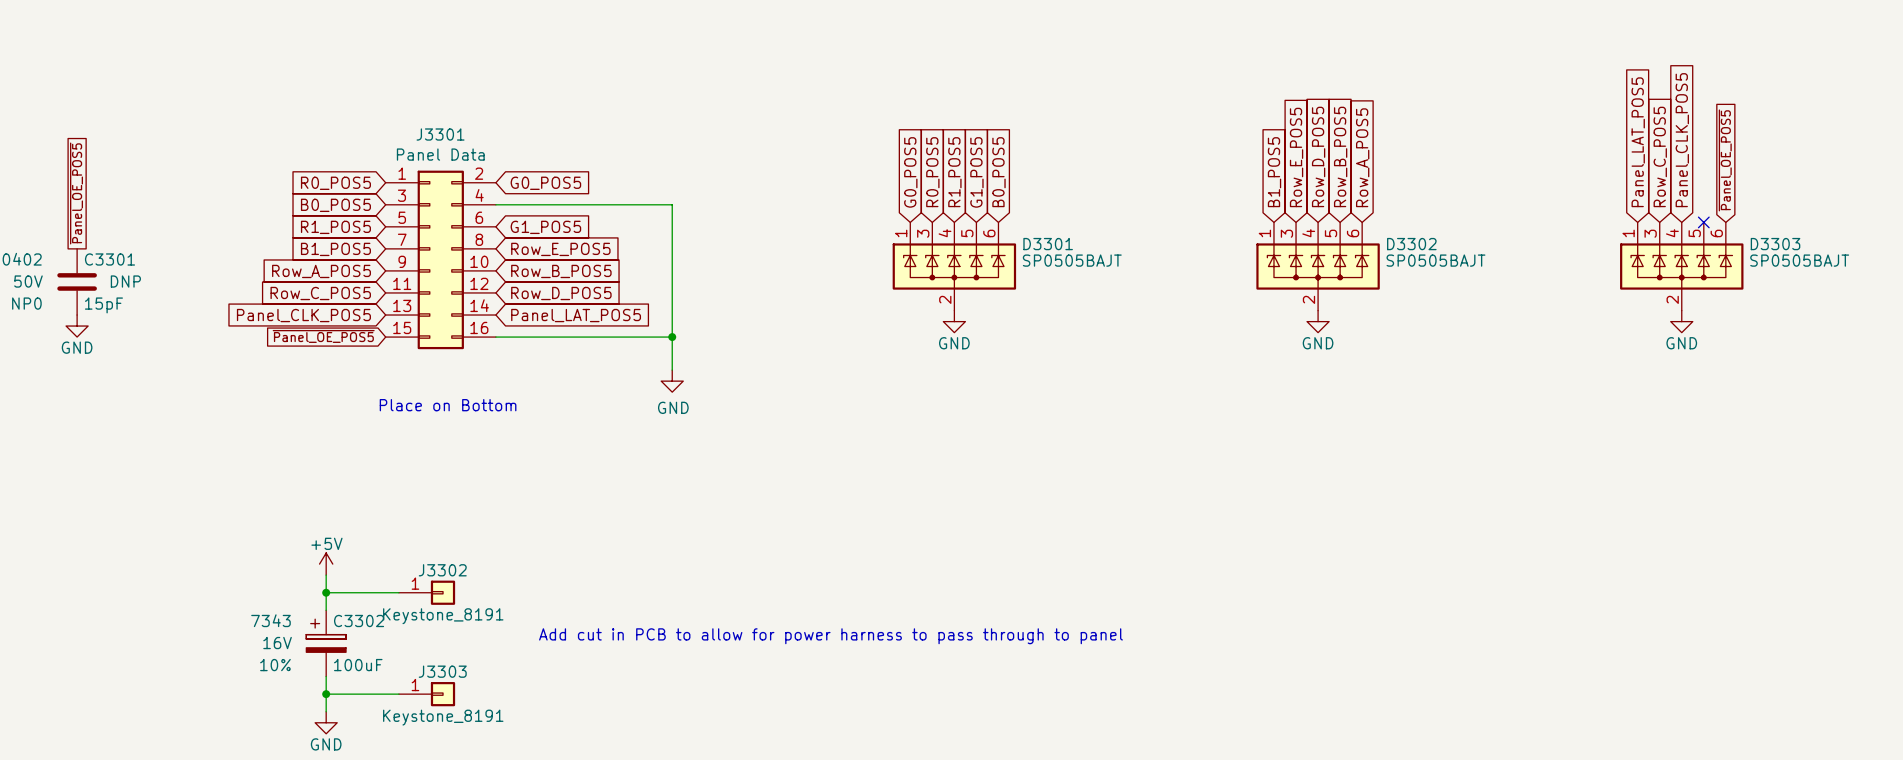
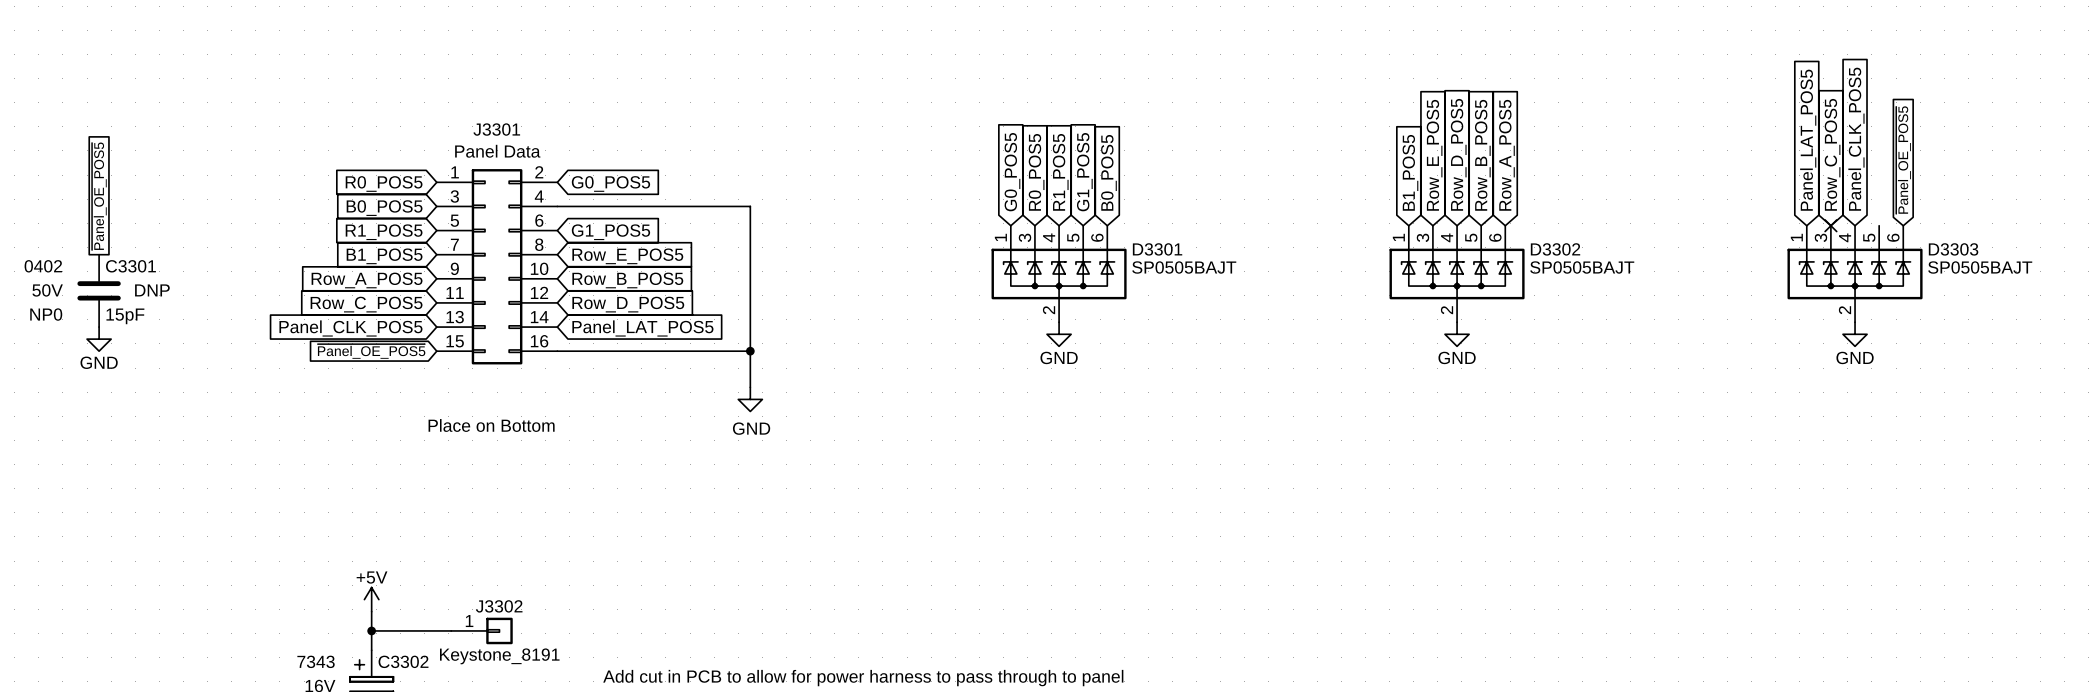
no-connect mark position: (1703, 222) -> (1830, 225)

